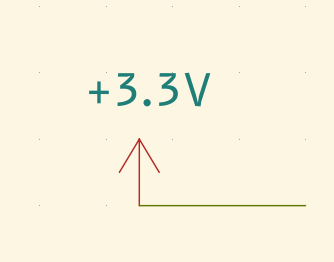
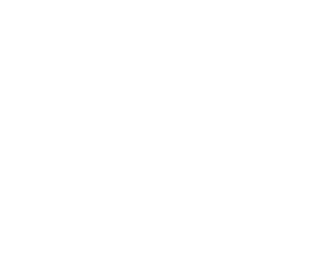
power symbol: +3.3V (139, 172) -> none
wire: (139, 205) (305, 205) -> none

